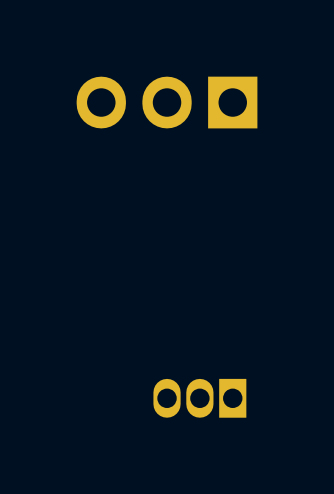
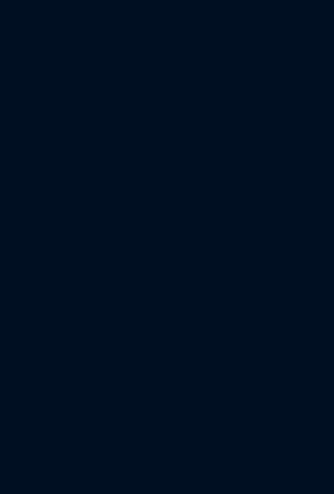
part: (167, 102) -> none
part: (199, 398) -> none

